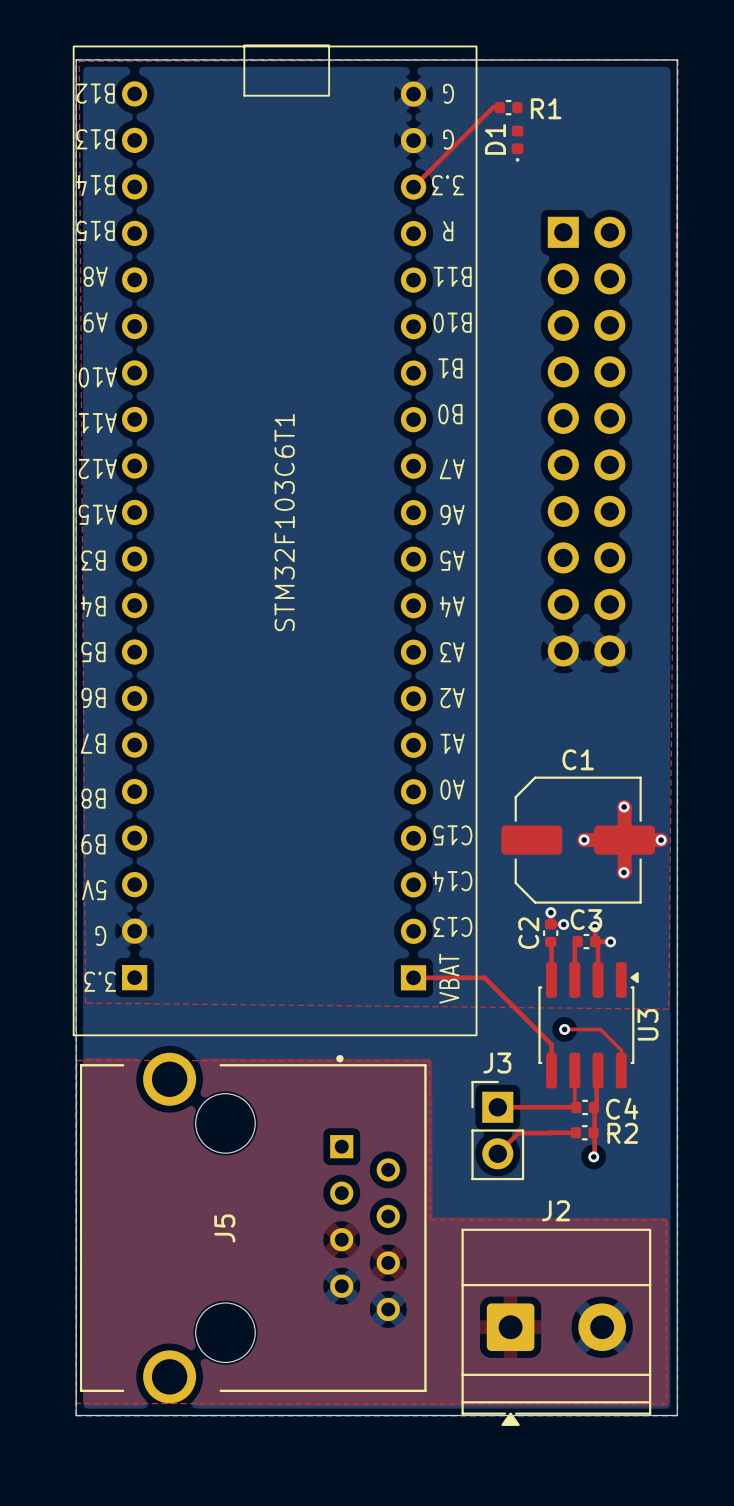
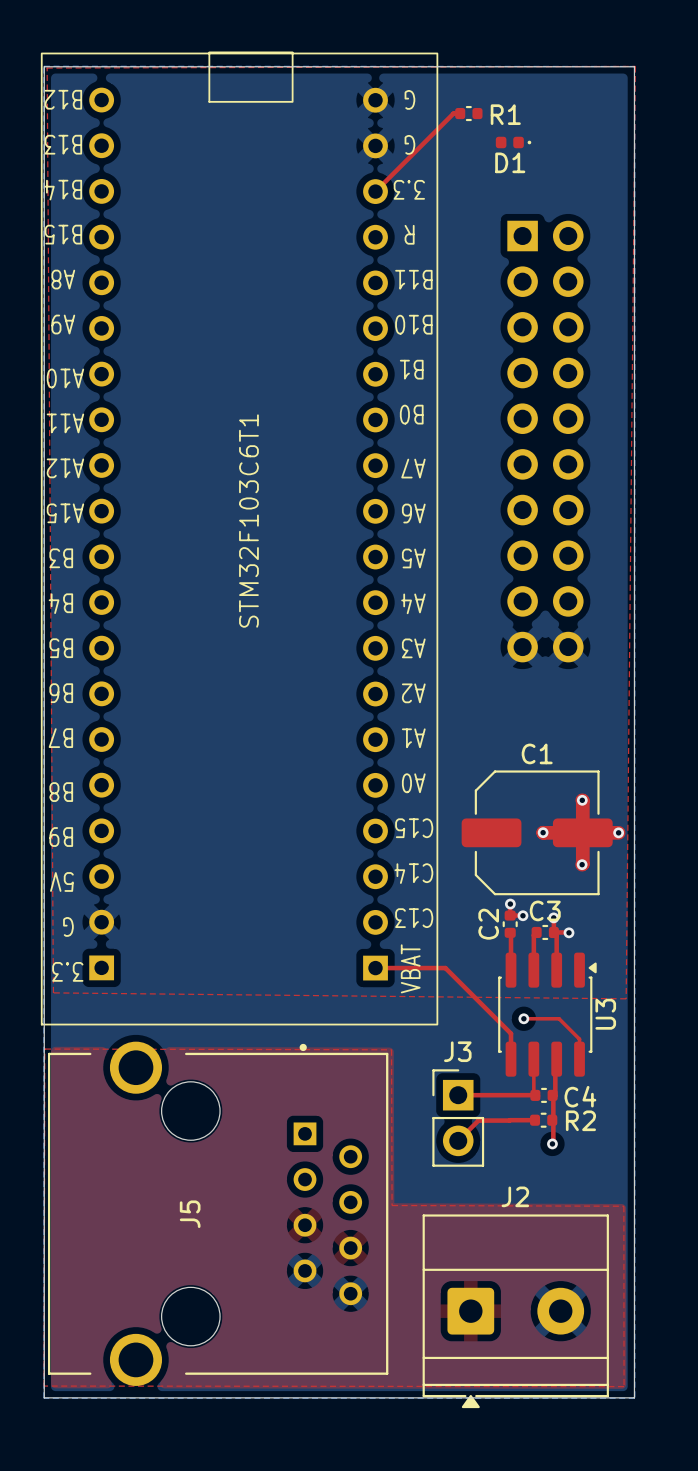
D1 rotation: 0° (517, 143) -> 90° counterclockwise (513, 142)
D1 position: (517, 143) -> (513, 142)

